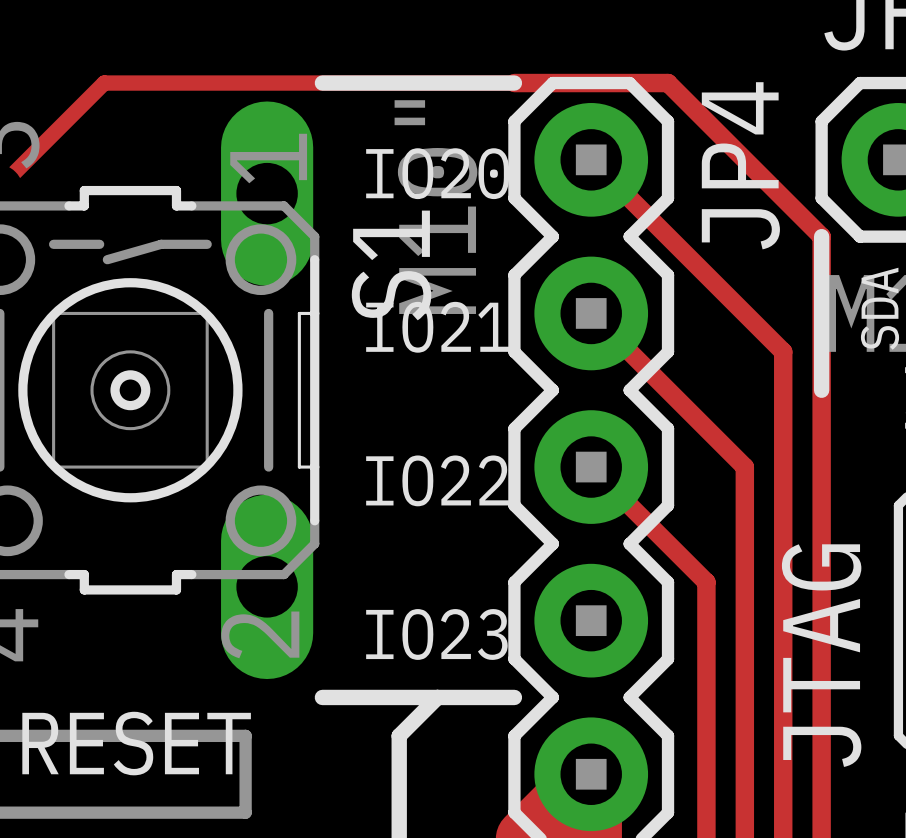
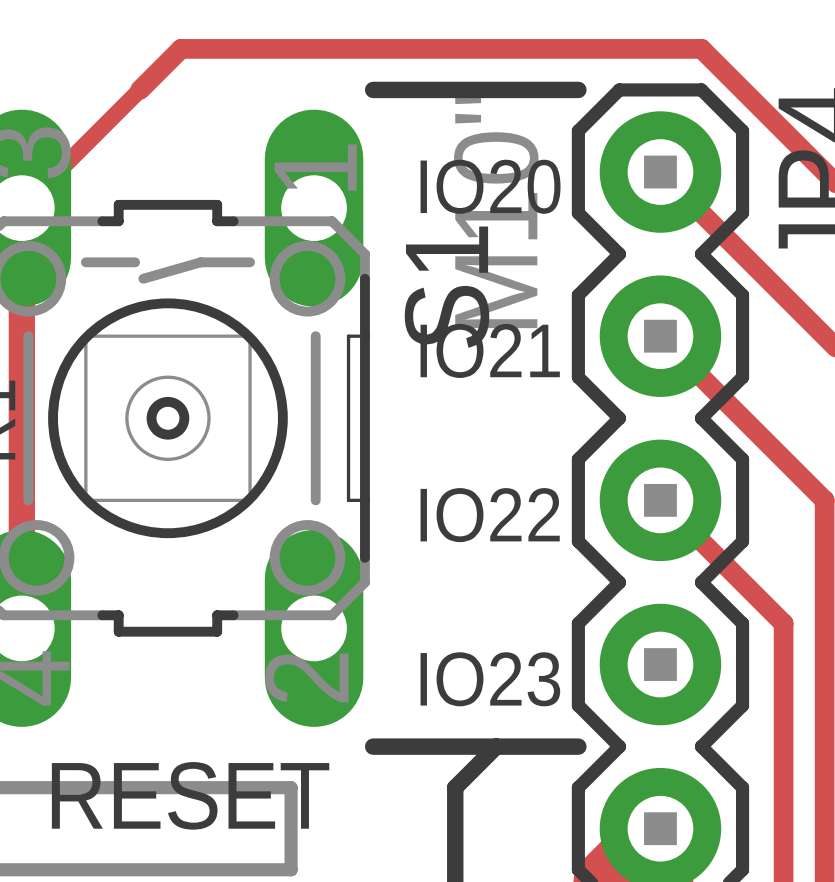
track: (104, 83) (668, 83) -> (140, 89) (181, 48) (701, 48) (742, 89)

